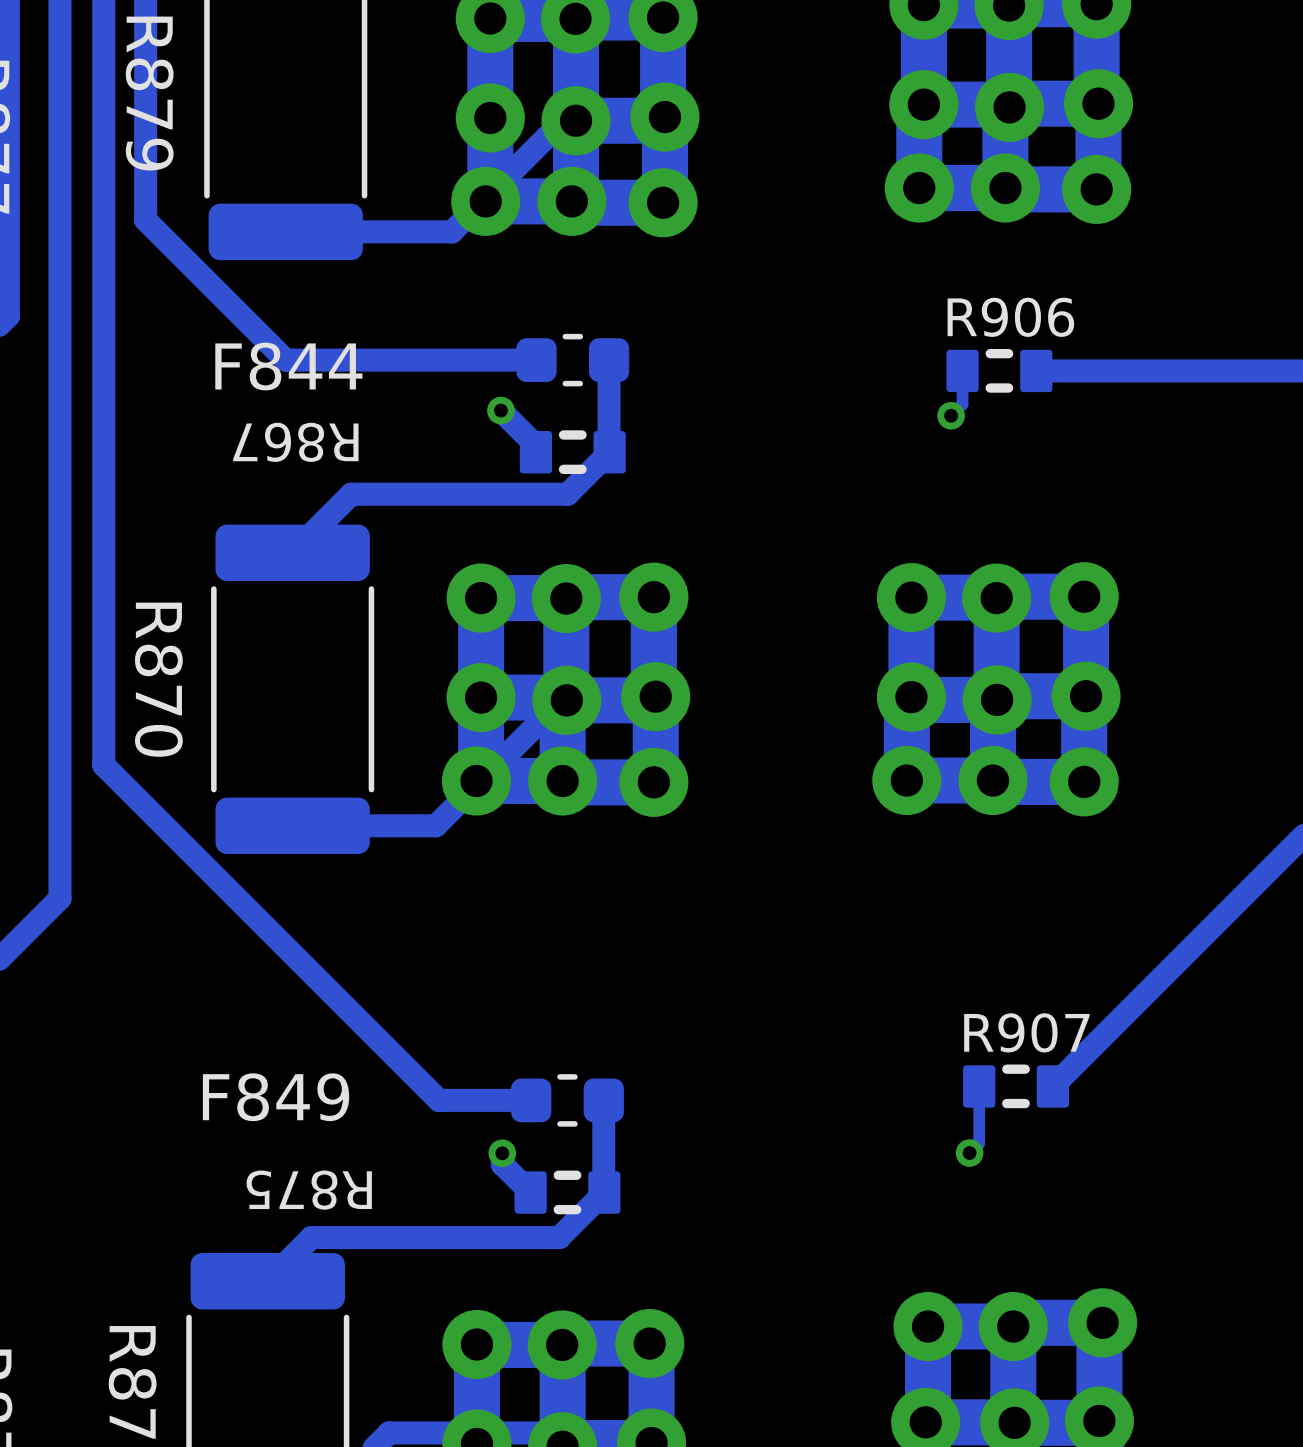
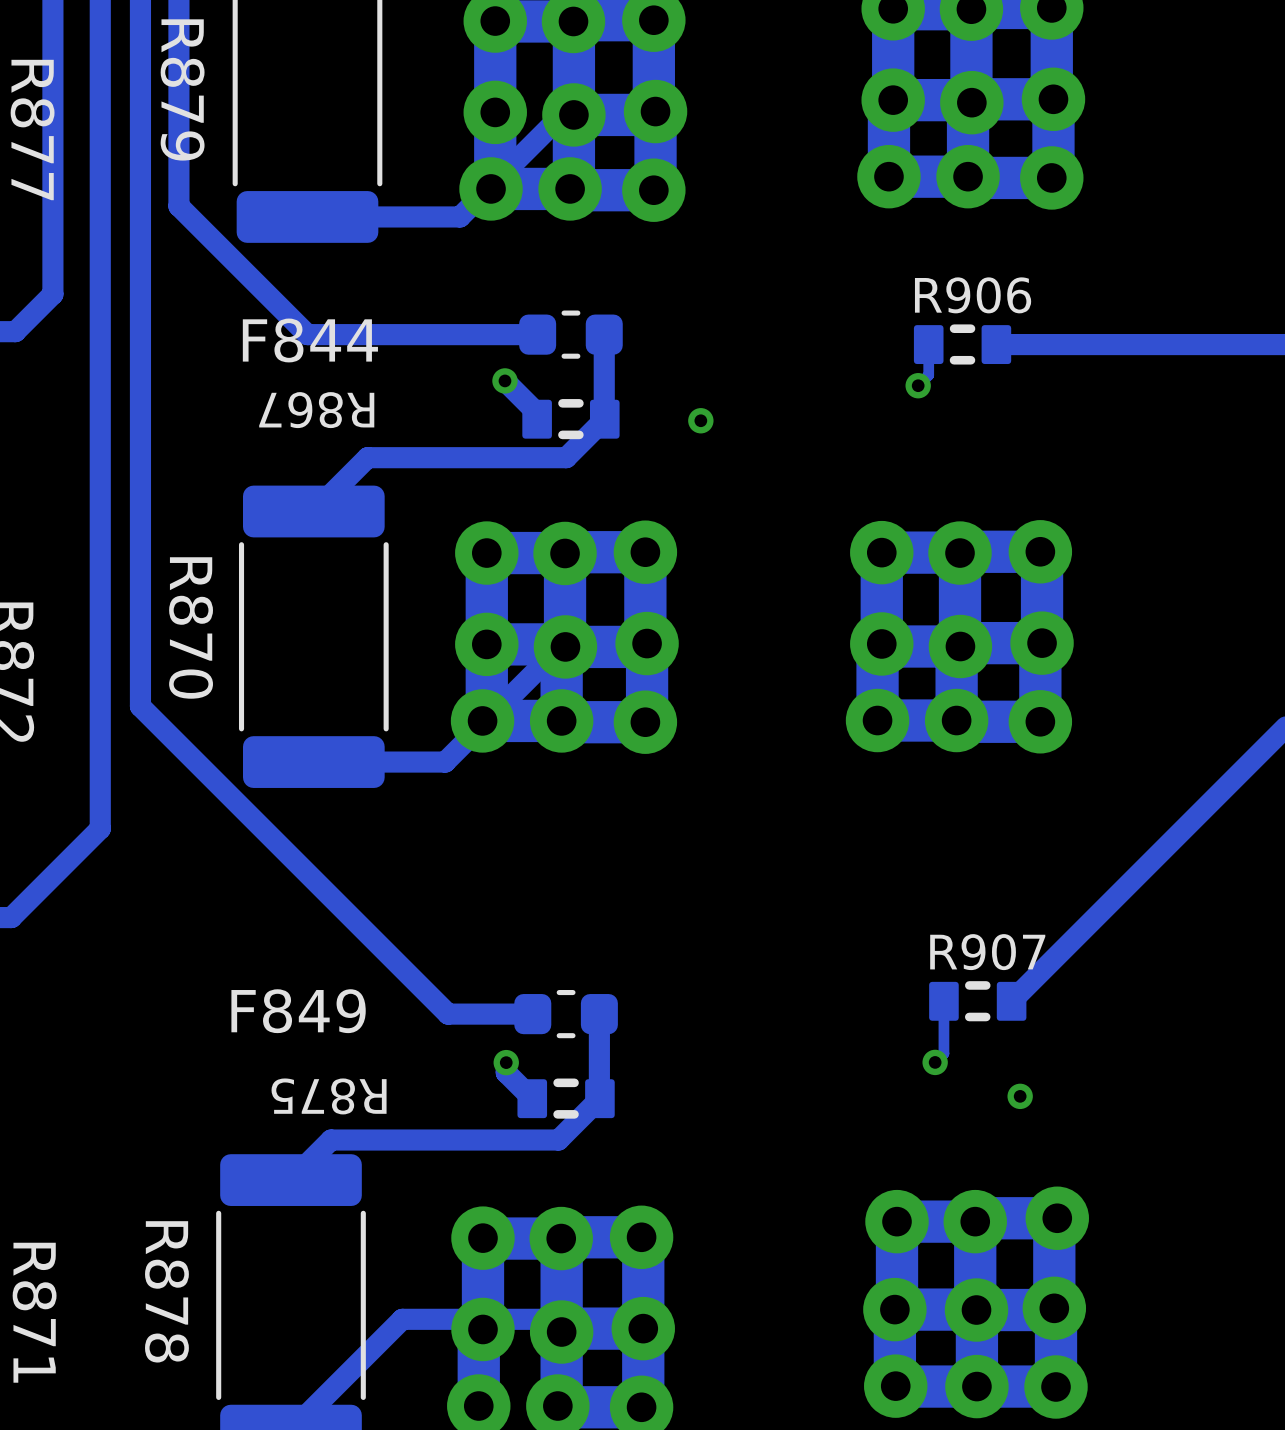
via: none -> (700, 420)
via: none -> (1020, 1096)

